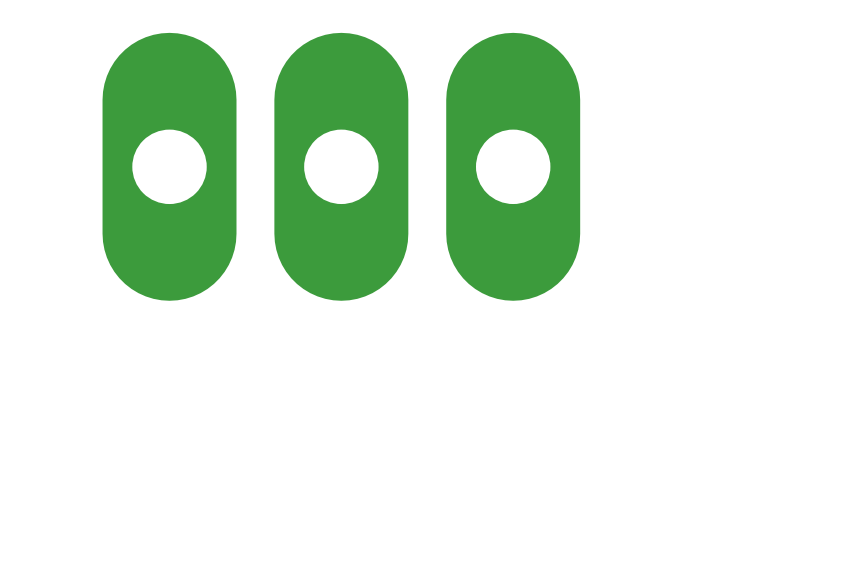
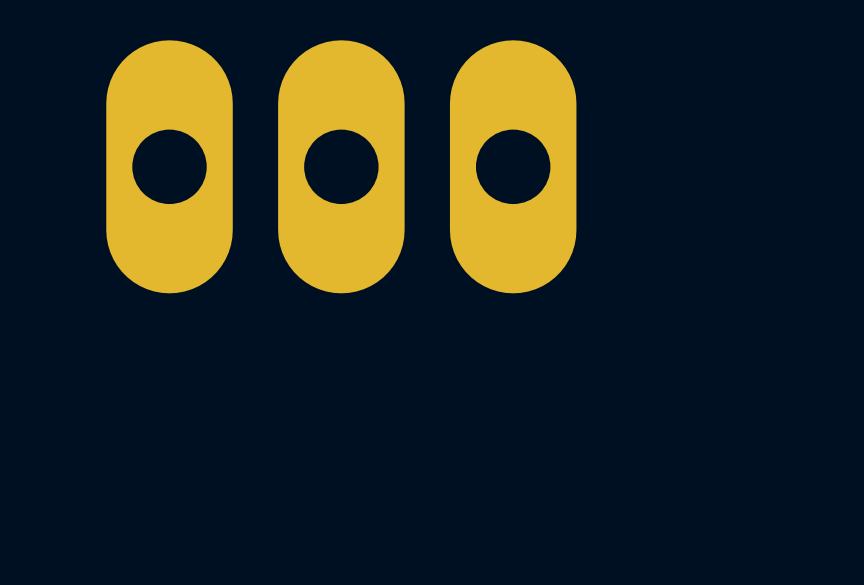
part footprint: [102, 32, 581, 301] -> [106, 40, 577, 294]

